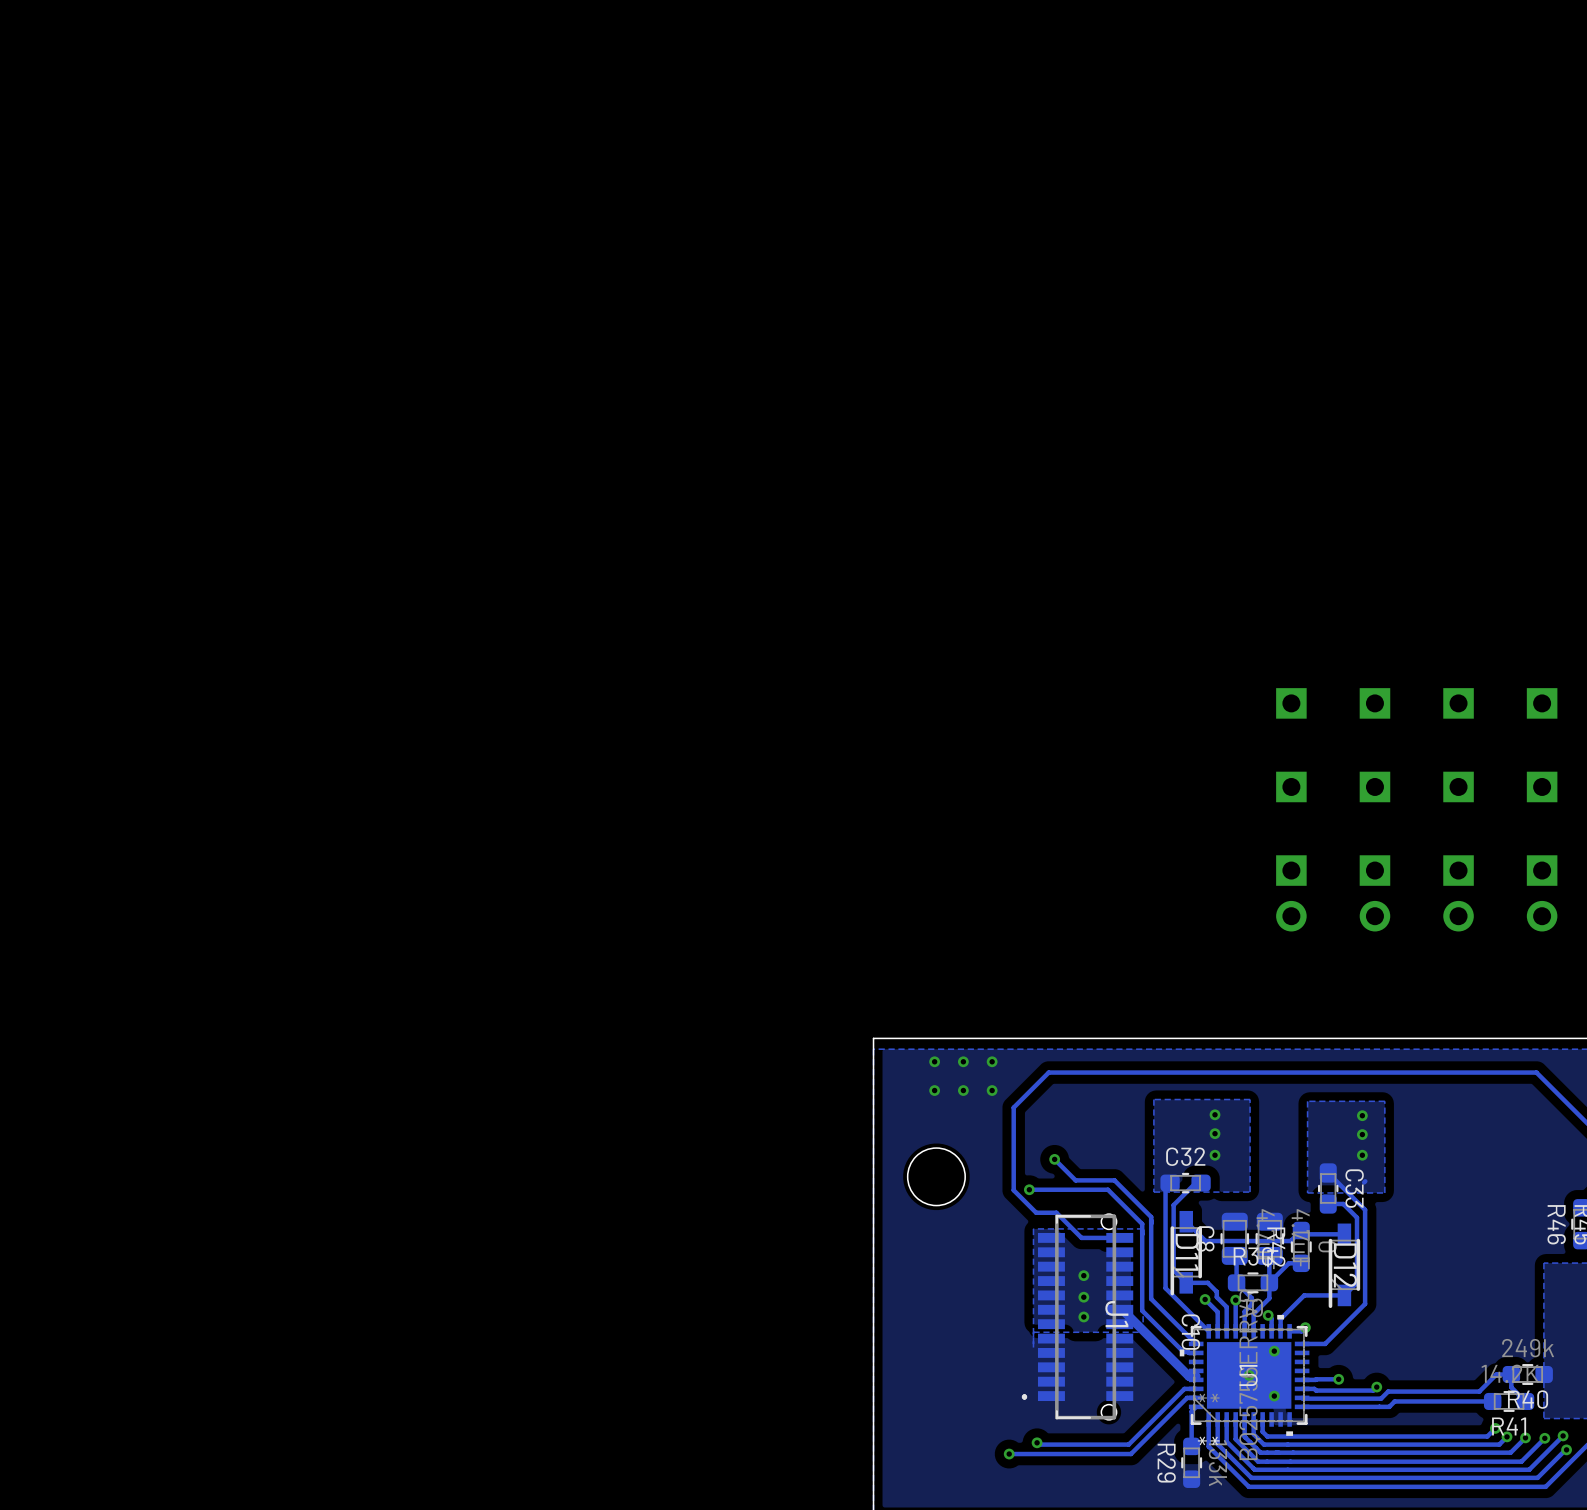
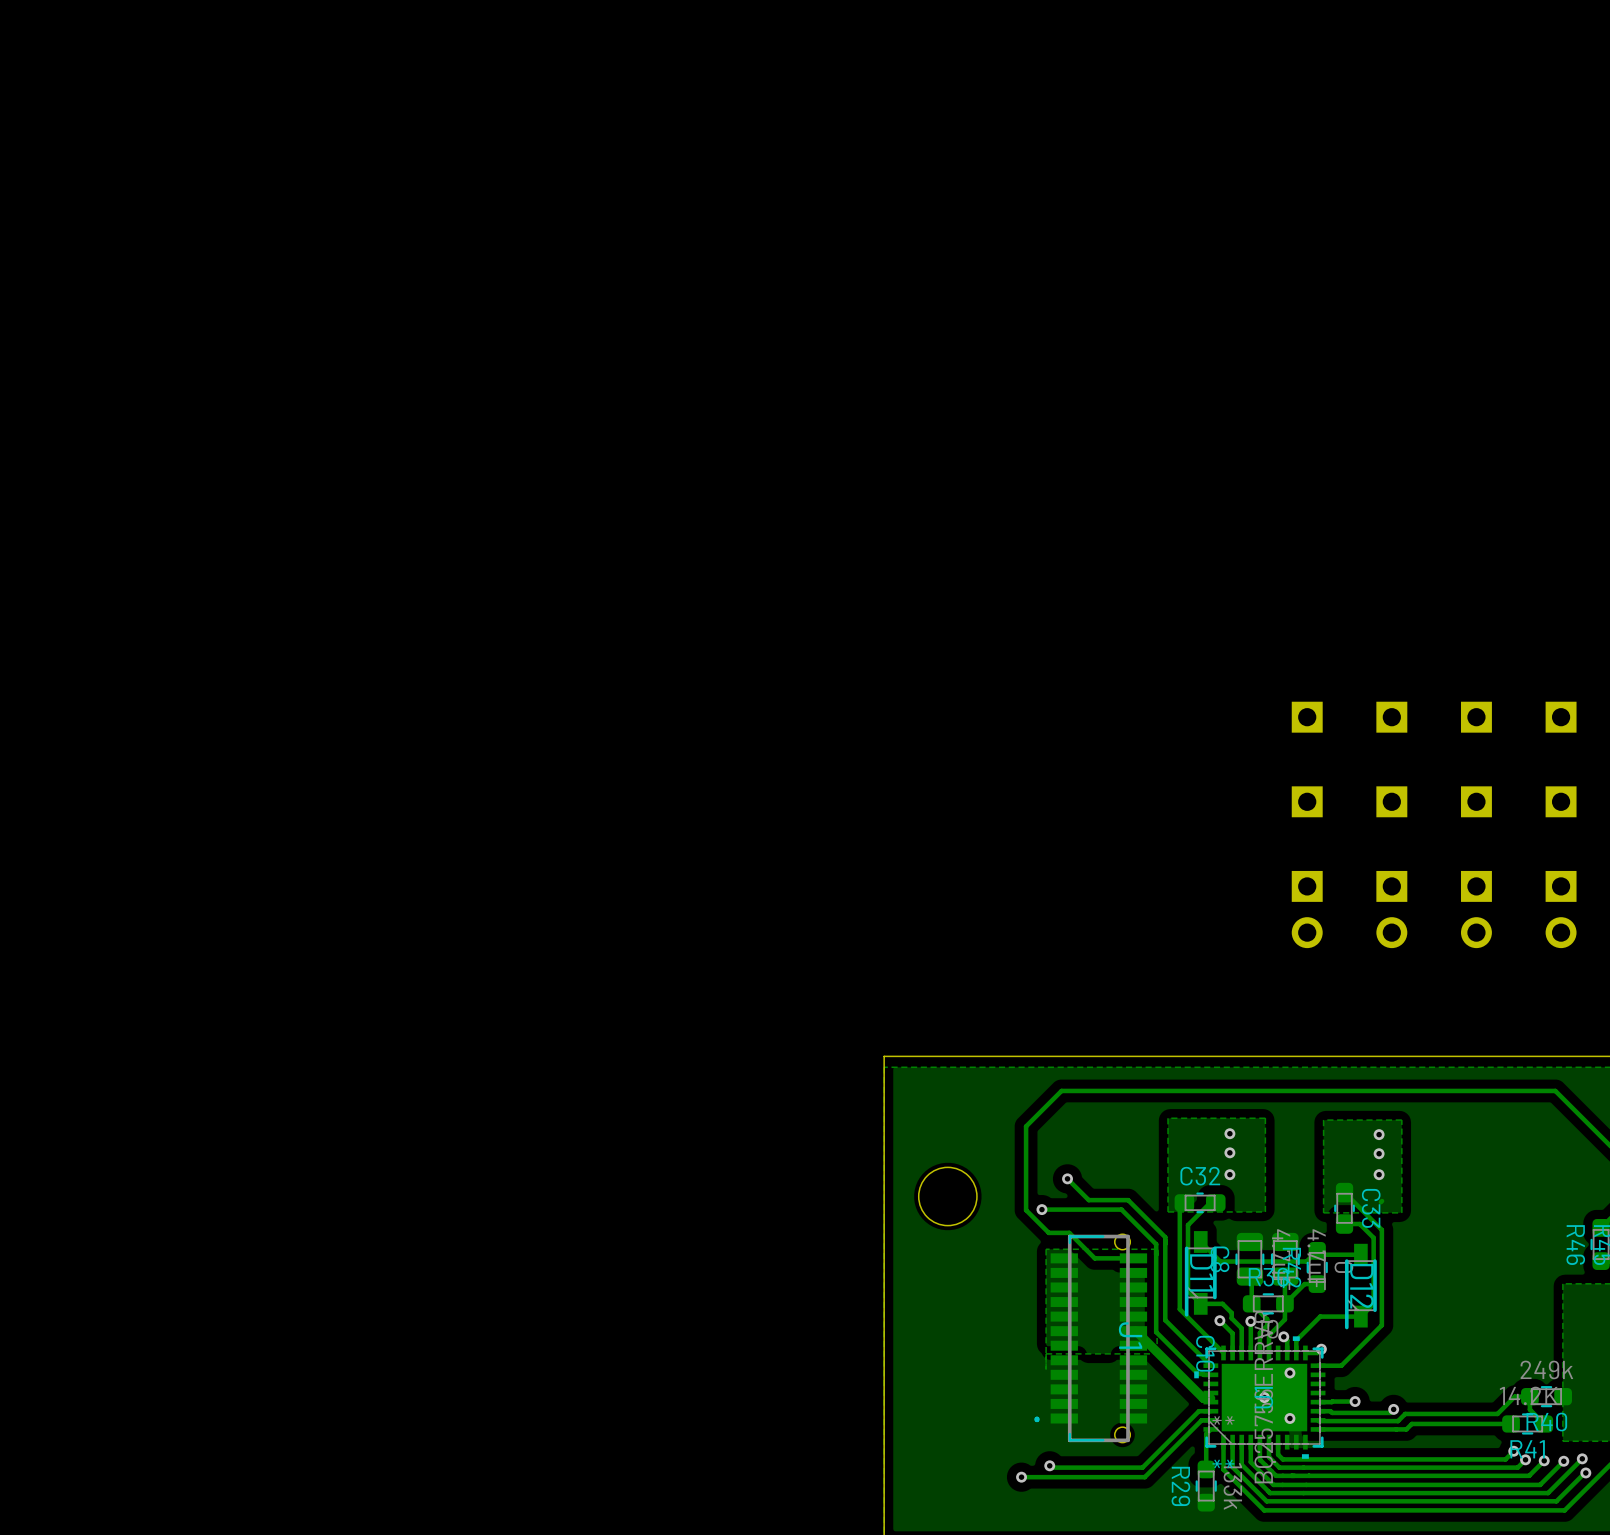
via: (934, 1061) -> none
via: (963, 1061) -> none
via: (992, 1061) -> none
via: (934, 1090) -> none
via: (963, 1090) -> none
via: (992, 1090) -> none
via: (1083, 1275) -> none
via: (1083, 1297) -> none
via: (1083, 1316) -> none

